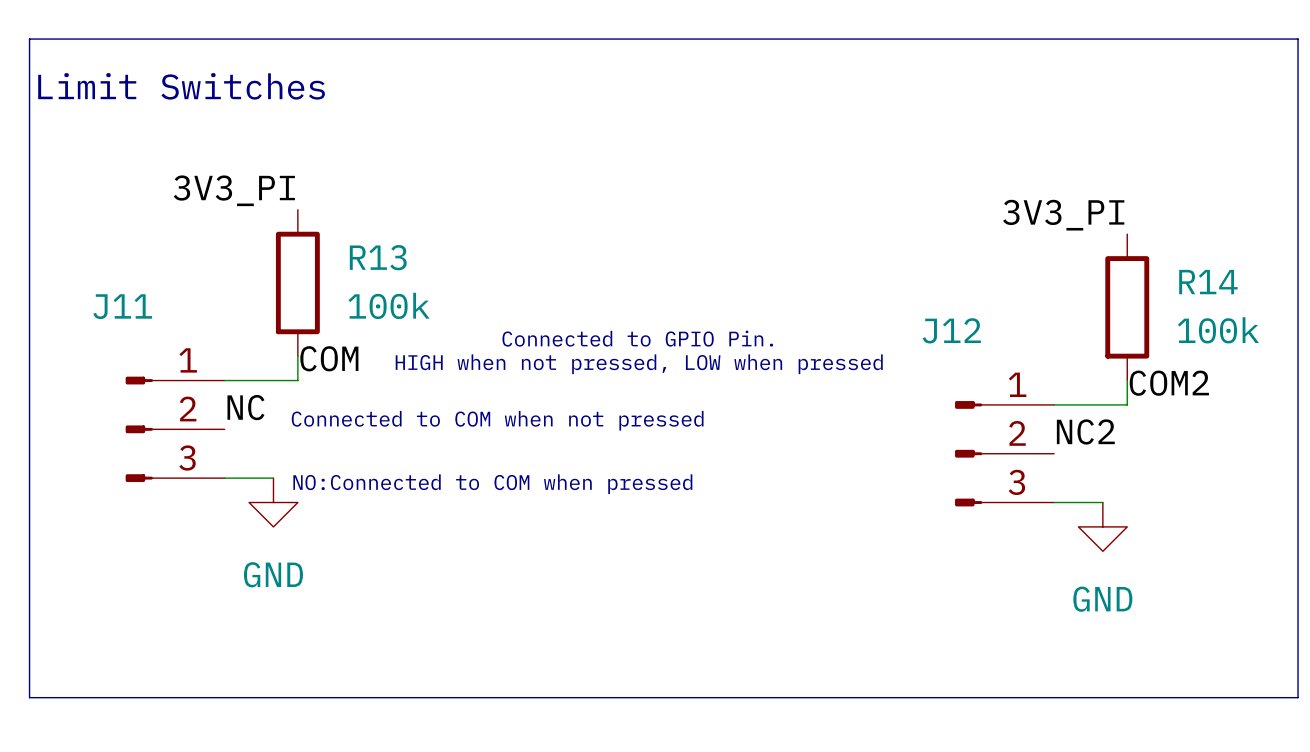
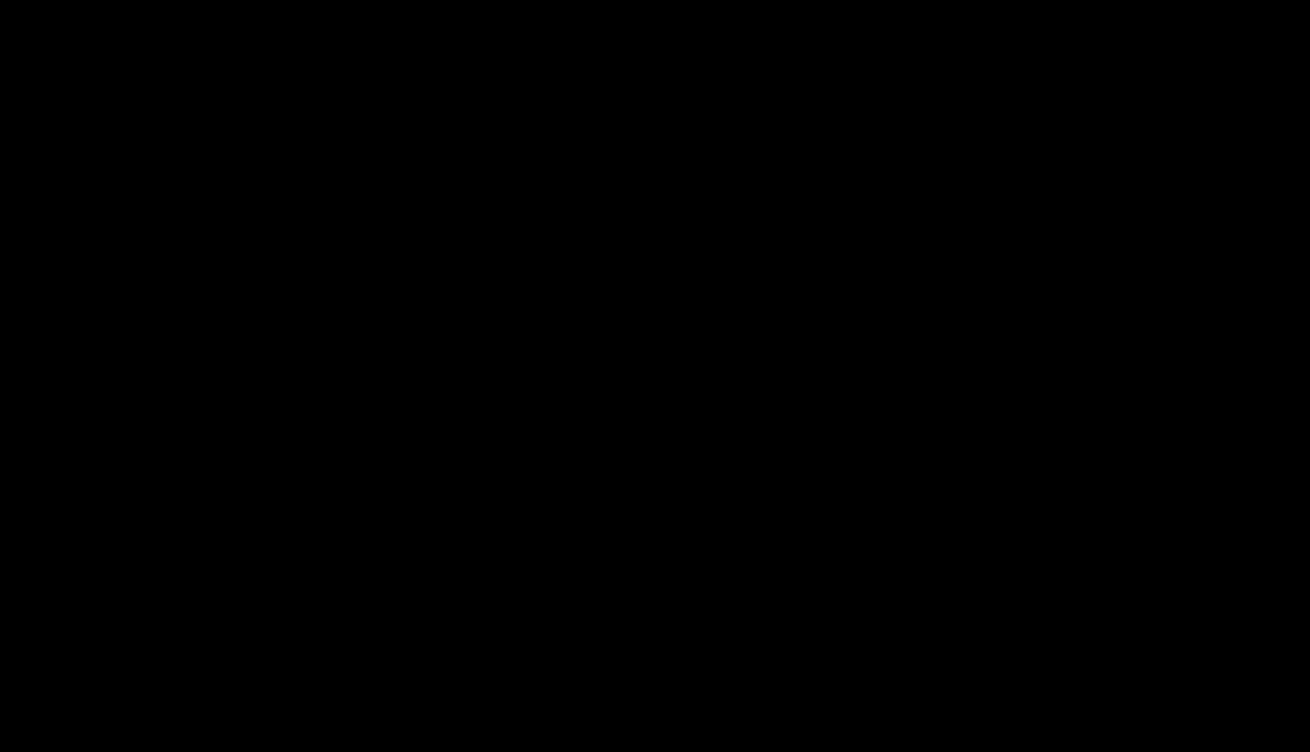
line: (29, 39) (1298, 39) (1298, 697) (29, 697) (29, 39) -> none
text: Limit Switches (181, 86) -> none
label: 3V3_PI (234, 190) -> none
label: 3V3_PI (1063, 215) -> none
R13: 100k (297, 282) -> none
R14: 100k (1127, 307) -> none
text: Connected to GPIO Pin. (637, 338) -> none
wire: (297, 356) (297, 380) (224, 380) -> none
label: COM (329, 358) -> none
text: HIGH when not pressed, LOW when pressed (639, 364) -> none
wire: (1127, 380) (1127, 404) (1054, 404) -> none
label: COM2 (1169, 383) -> none
label: NC (245, 407) -> none
text: Connected to COM when not pressed (497, 420) -> none
J11: (175, 429) -> none
label: NC2 (1085, 431) -> none
J12: (1004, 453) -> none
wire: (224, 478) (273, 478) -> none
text: NO:Connected to COM when pressed (492, 484) -> none
power symbol: GND (273, 502) -> none
wire: (1054, 502) (1102, 502) -> none
power symbol: GND (1102, 526) -> none

